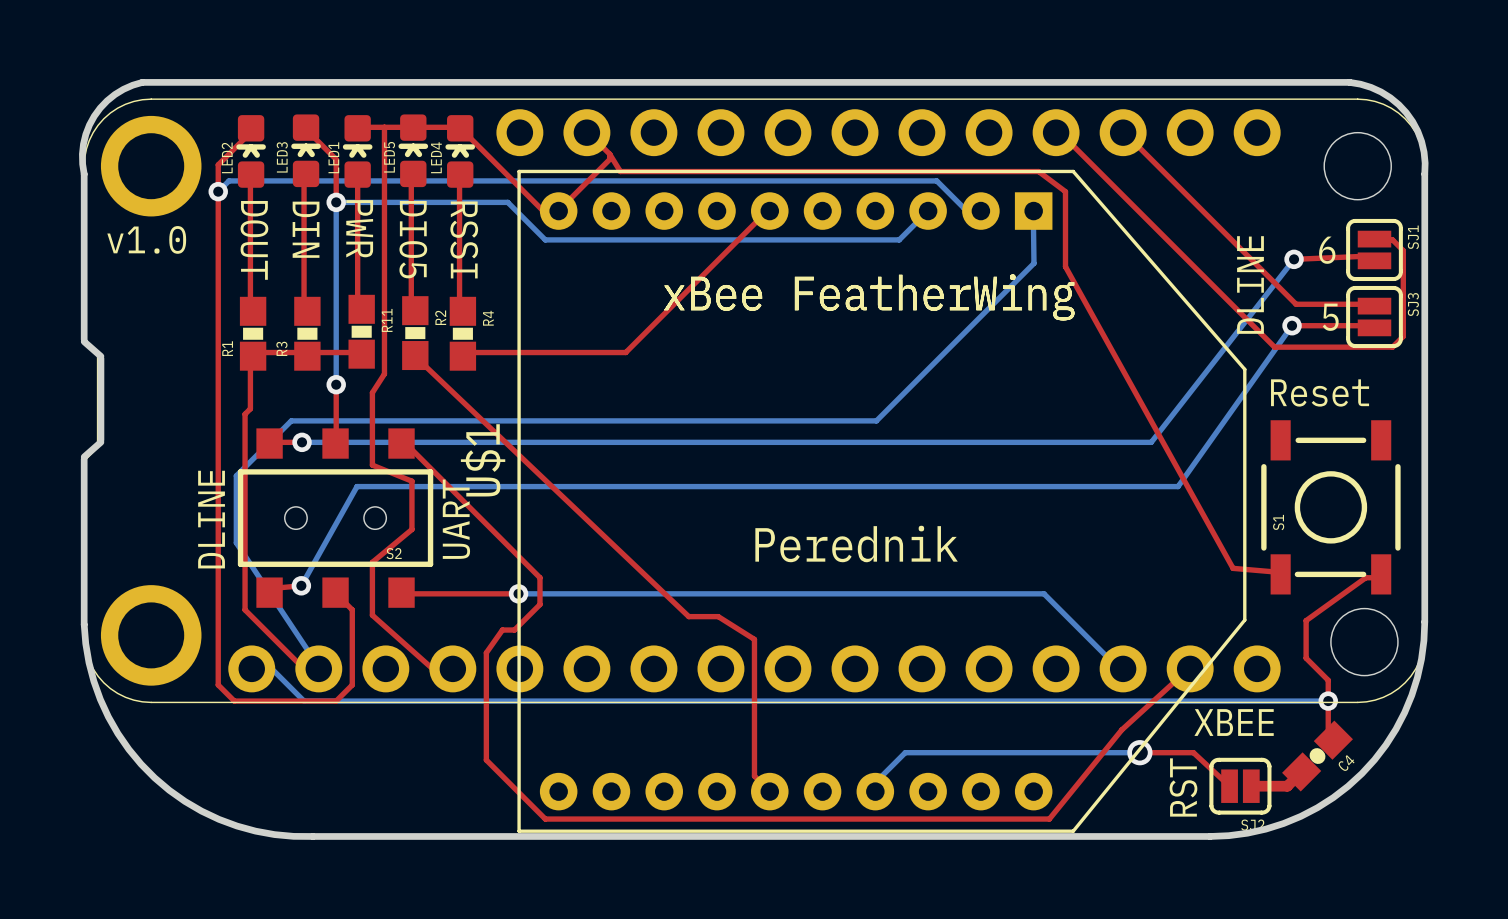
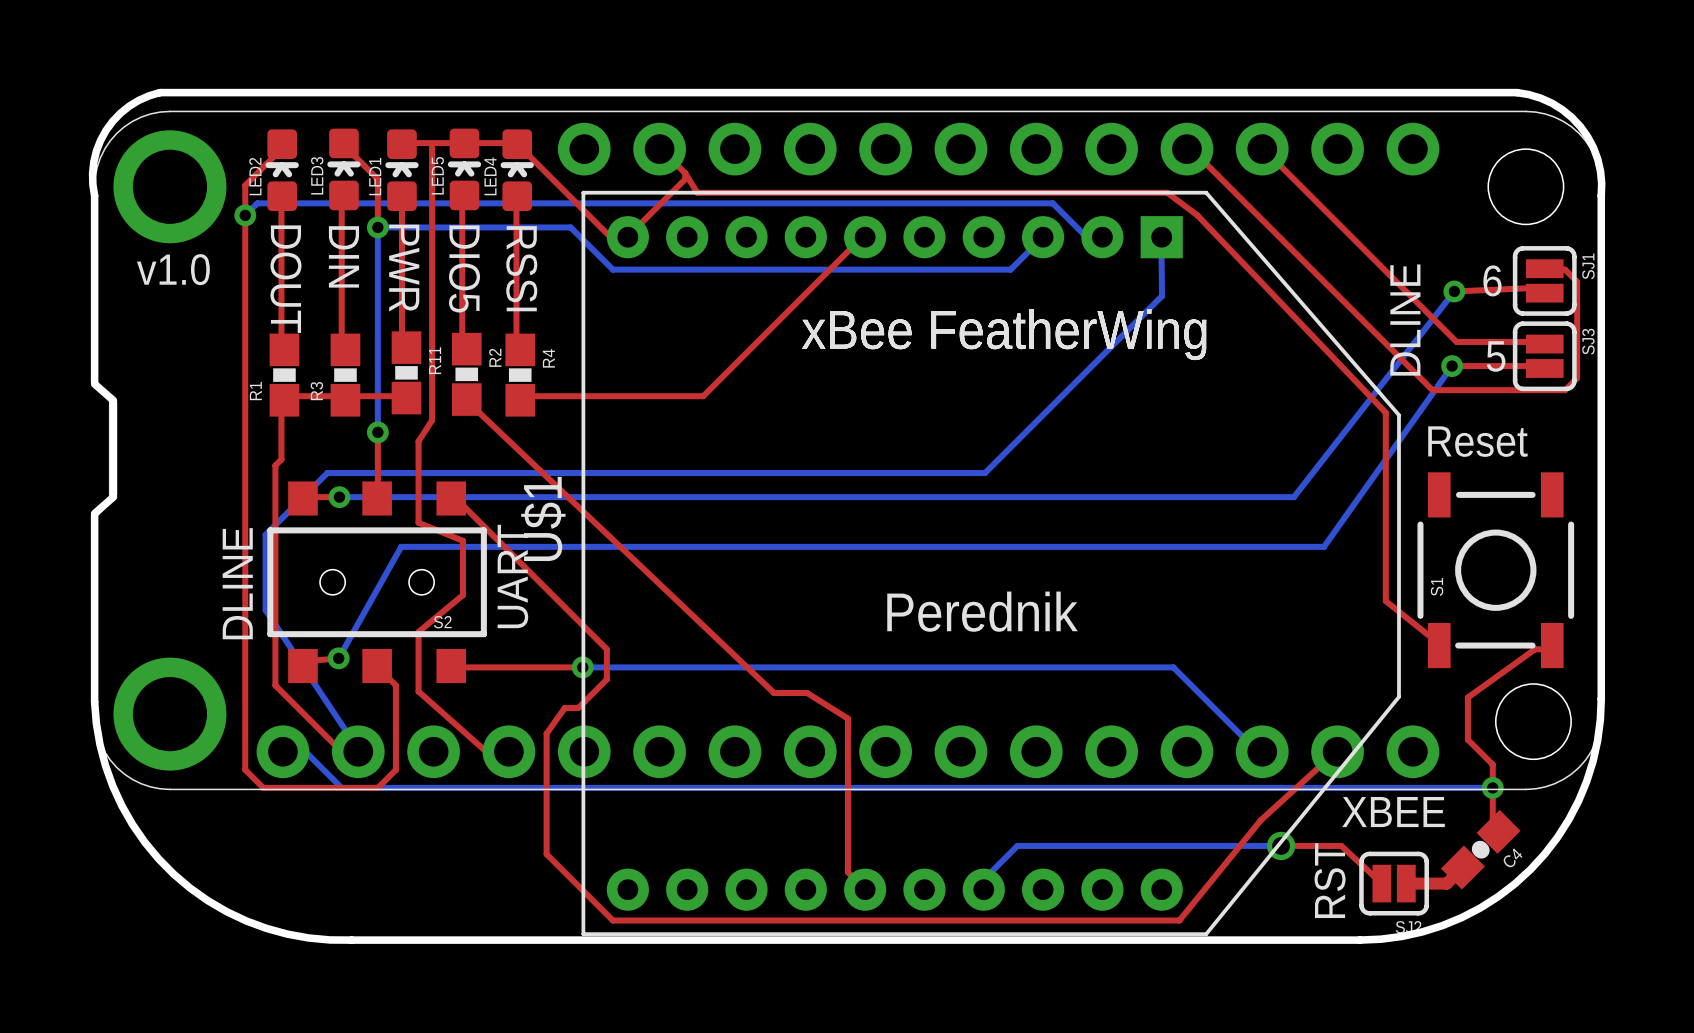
top track: (1065, 191) (1065, 266) (1233, 568) (1279, 572) -> (1197, 215) (1385, 412) (1385, 601) (1438, 643)

